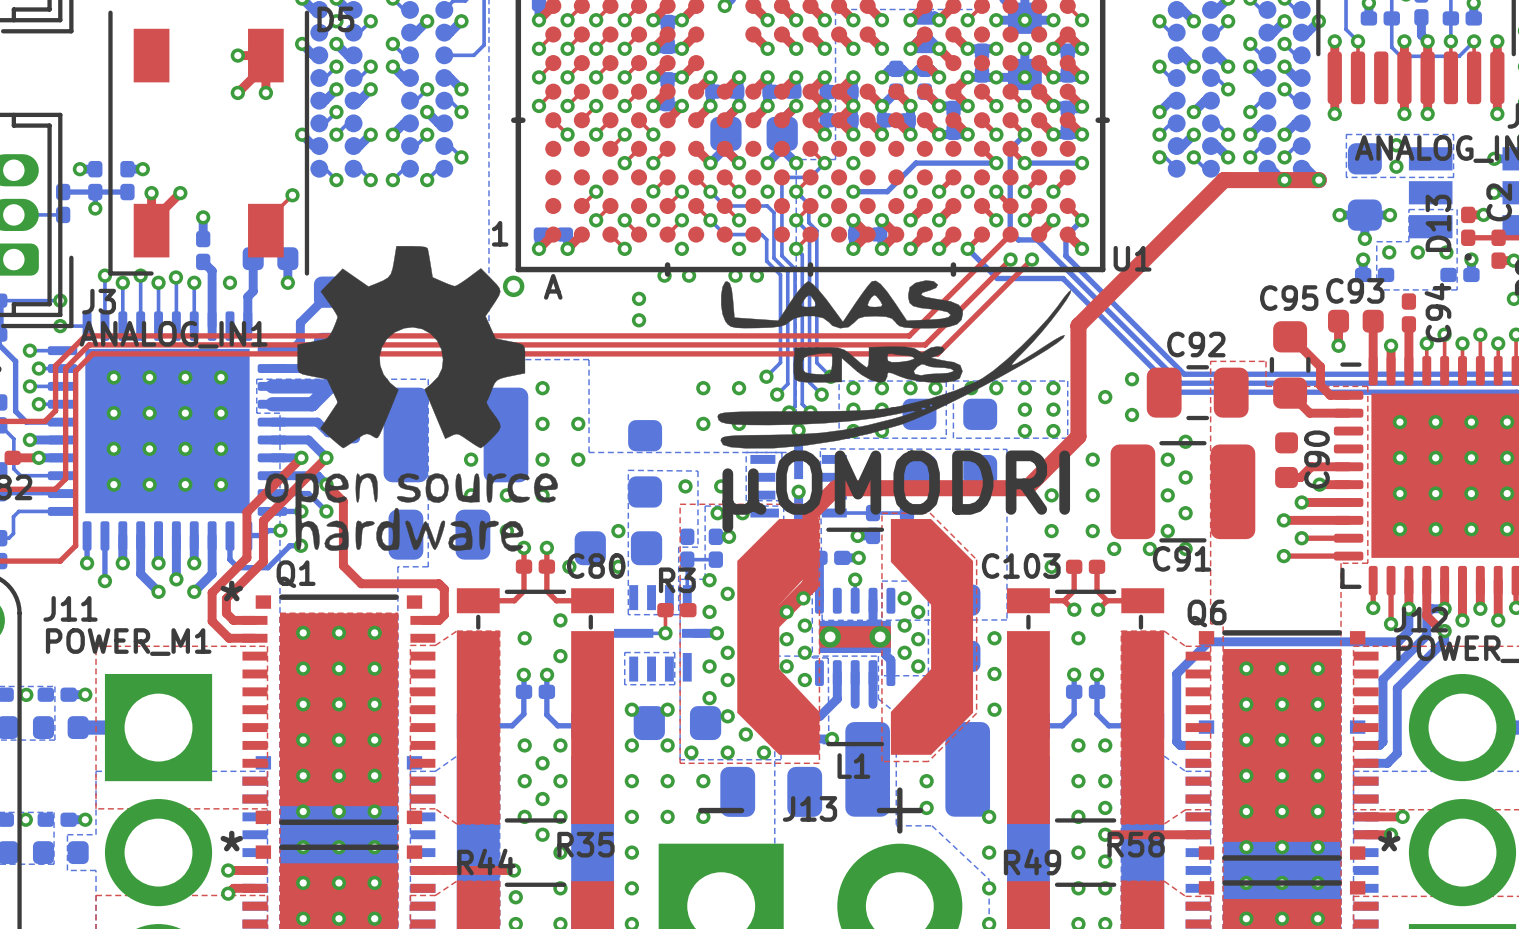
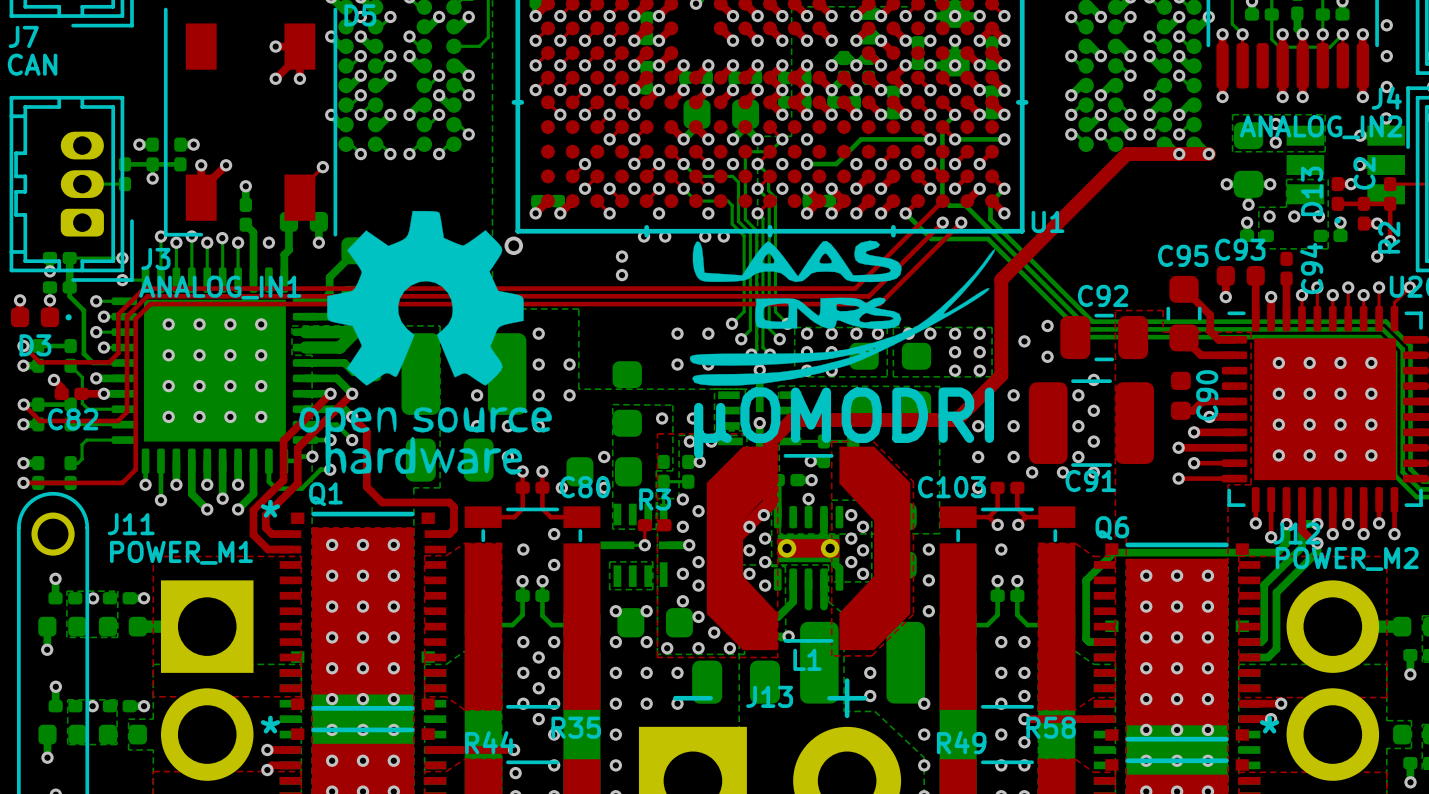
U1 text: 1 (500, 233) -> none
U1 text: A (553, 286) -> none

